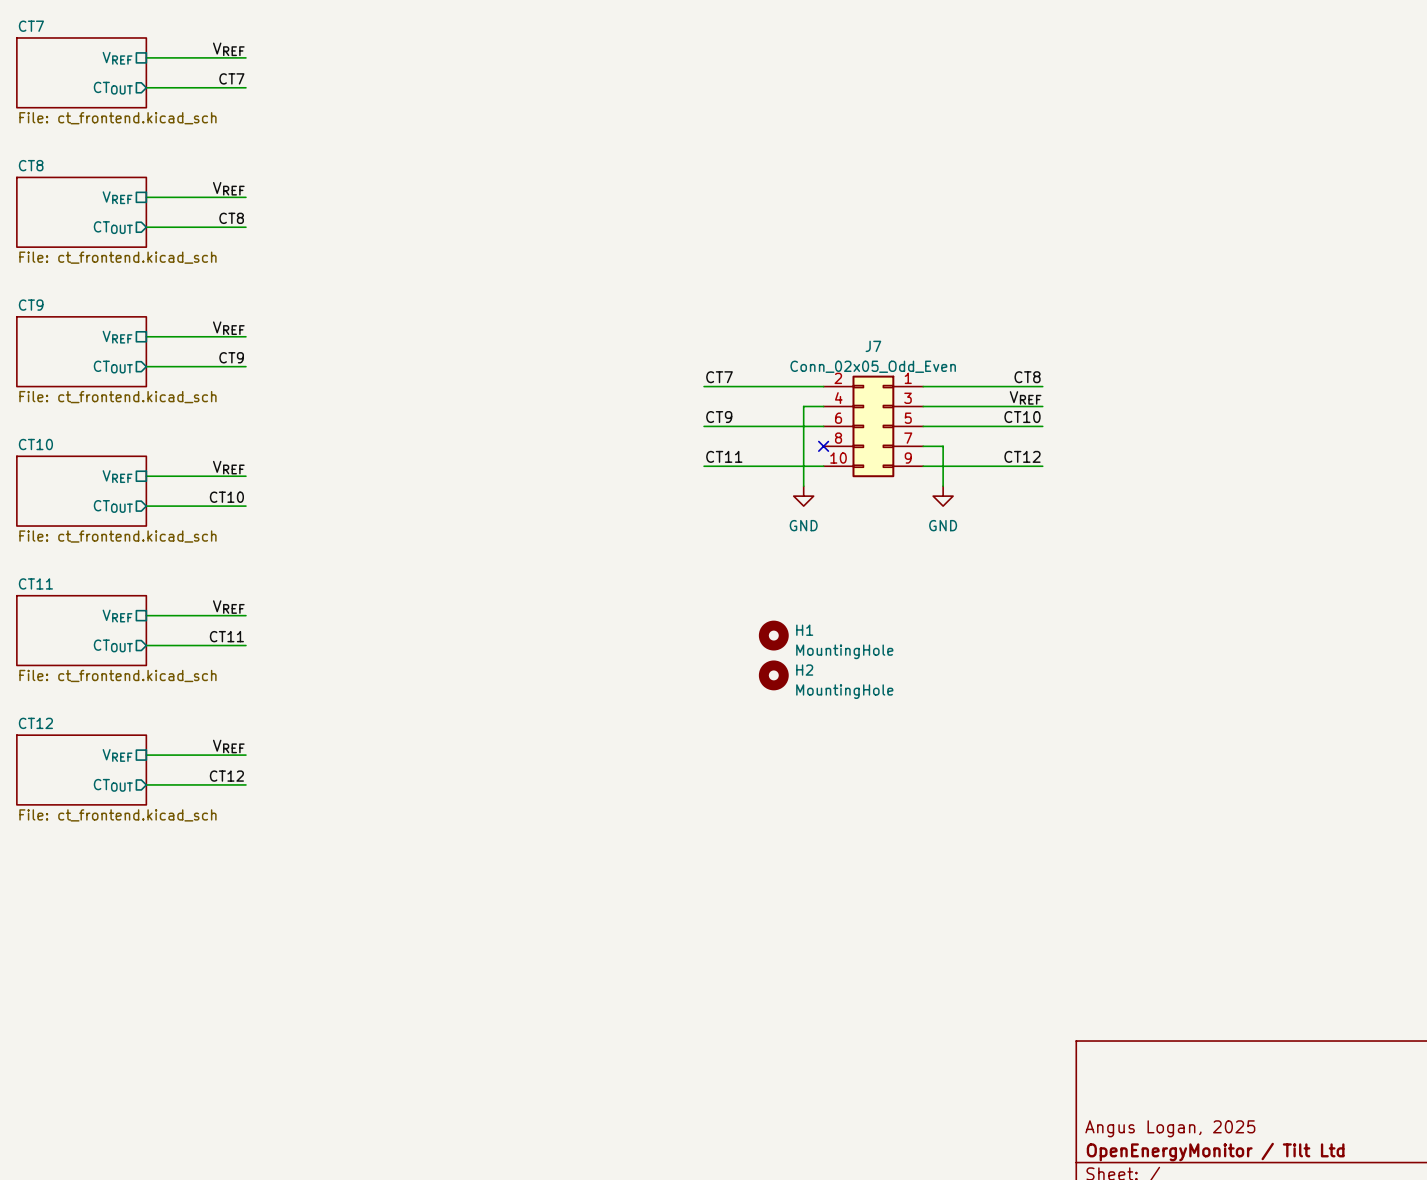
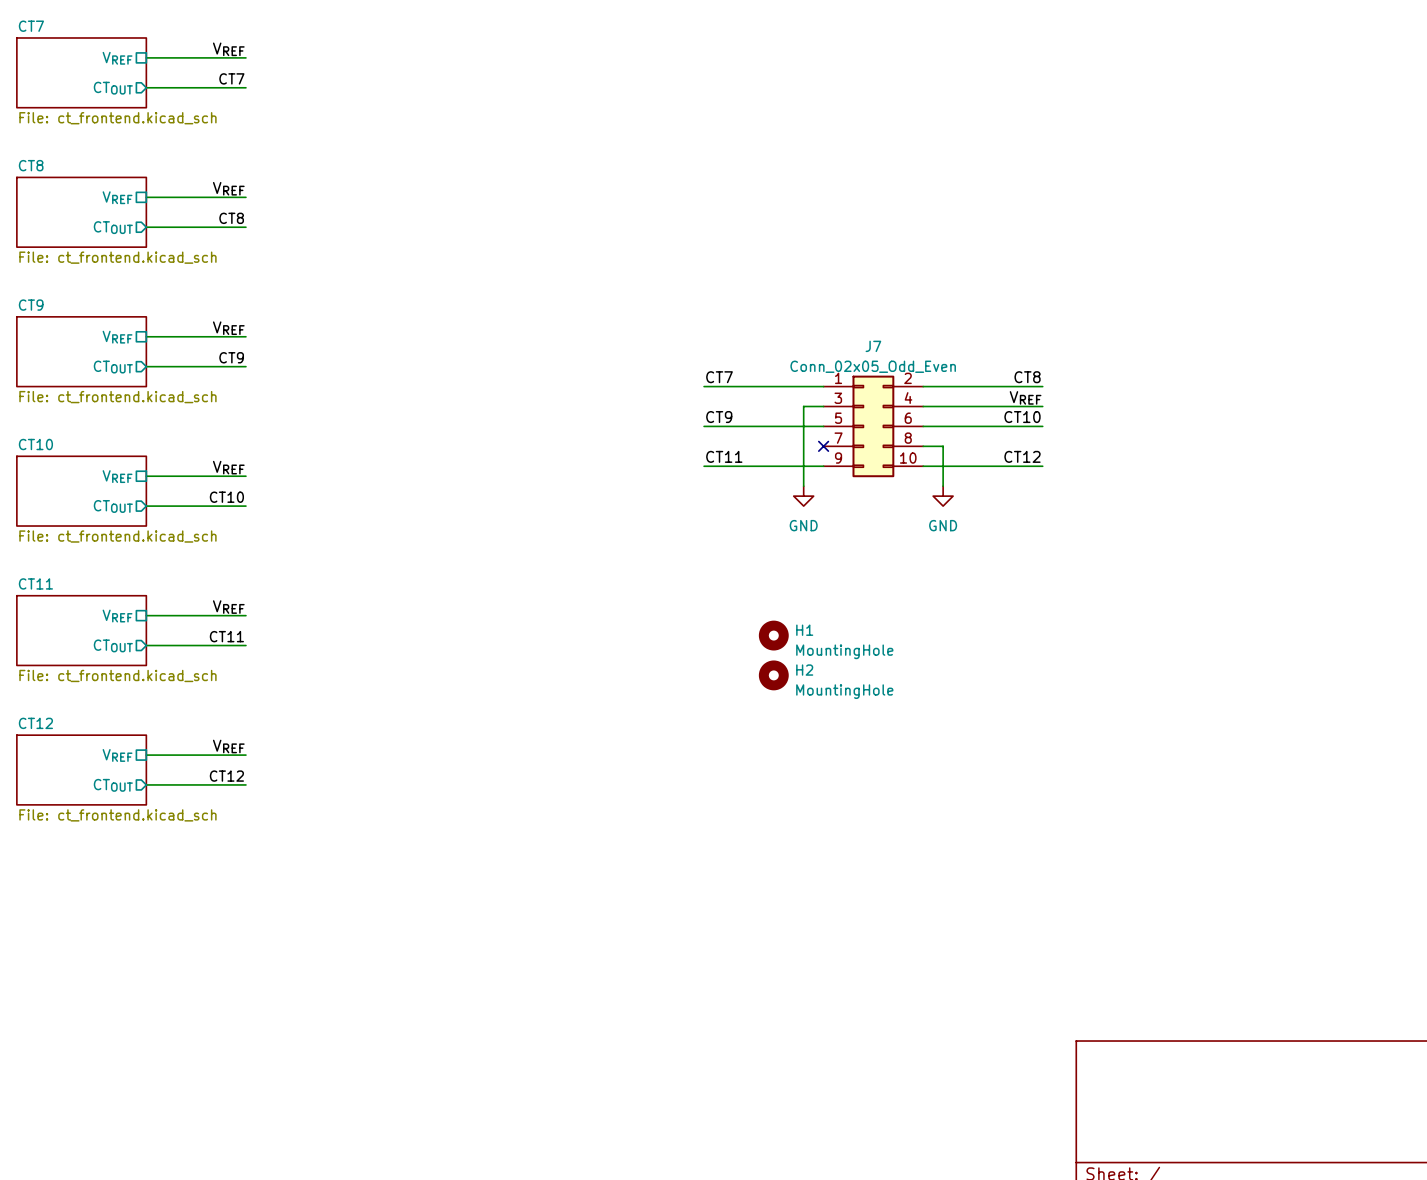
J7 flip: as is (873, 426) -> left-right (873, 426)
title block: Angus Logan, 2025 (1170, 1128) -> none
title block: OpenEnergyMonitor / Tilt Ltd (1215, 1152) -> none

